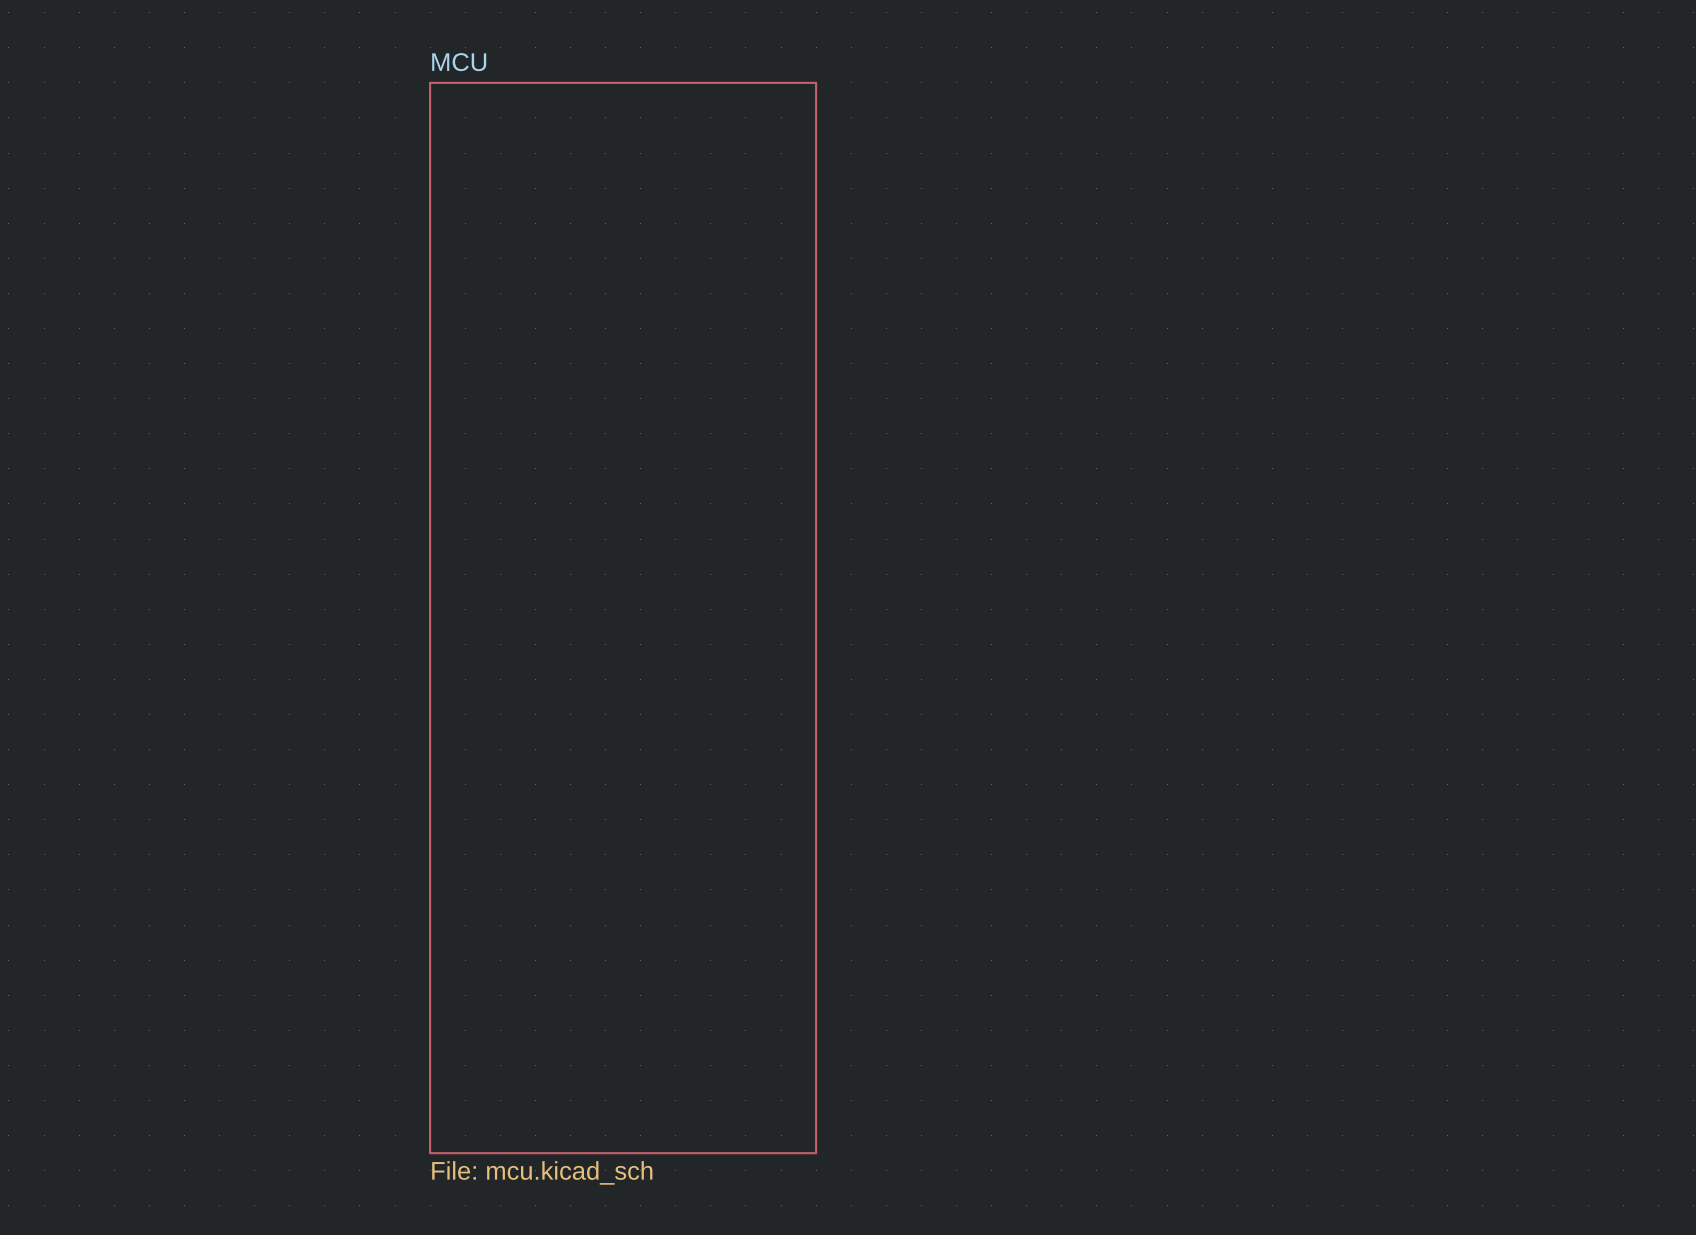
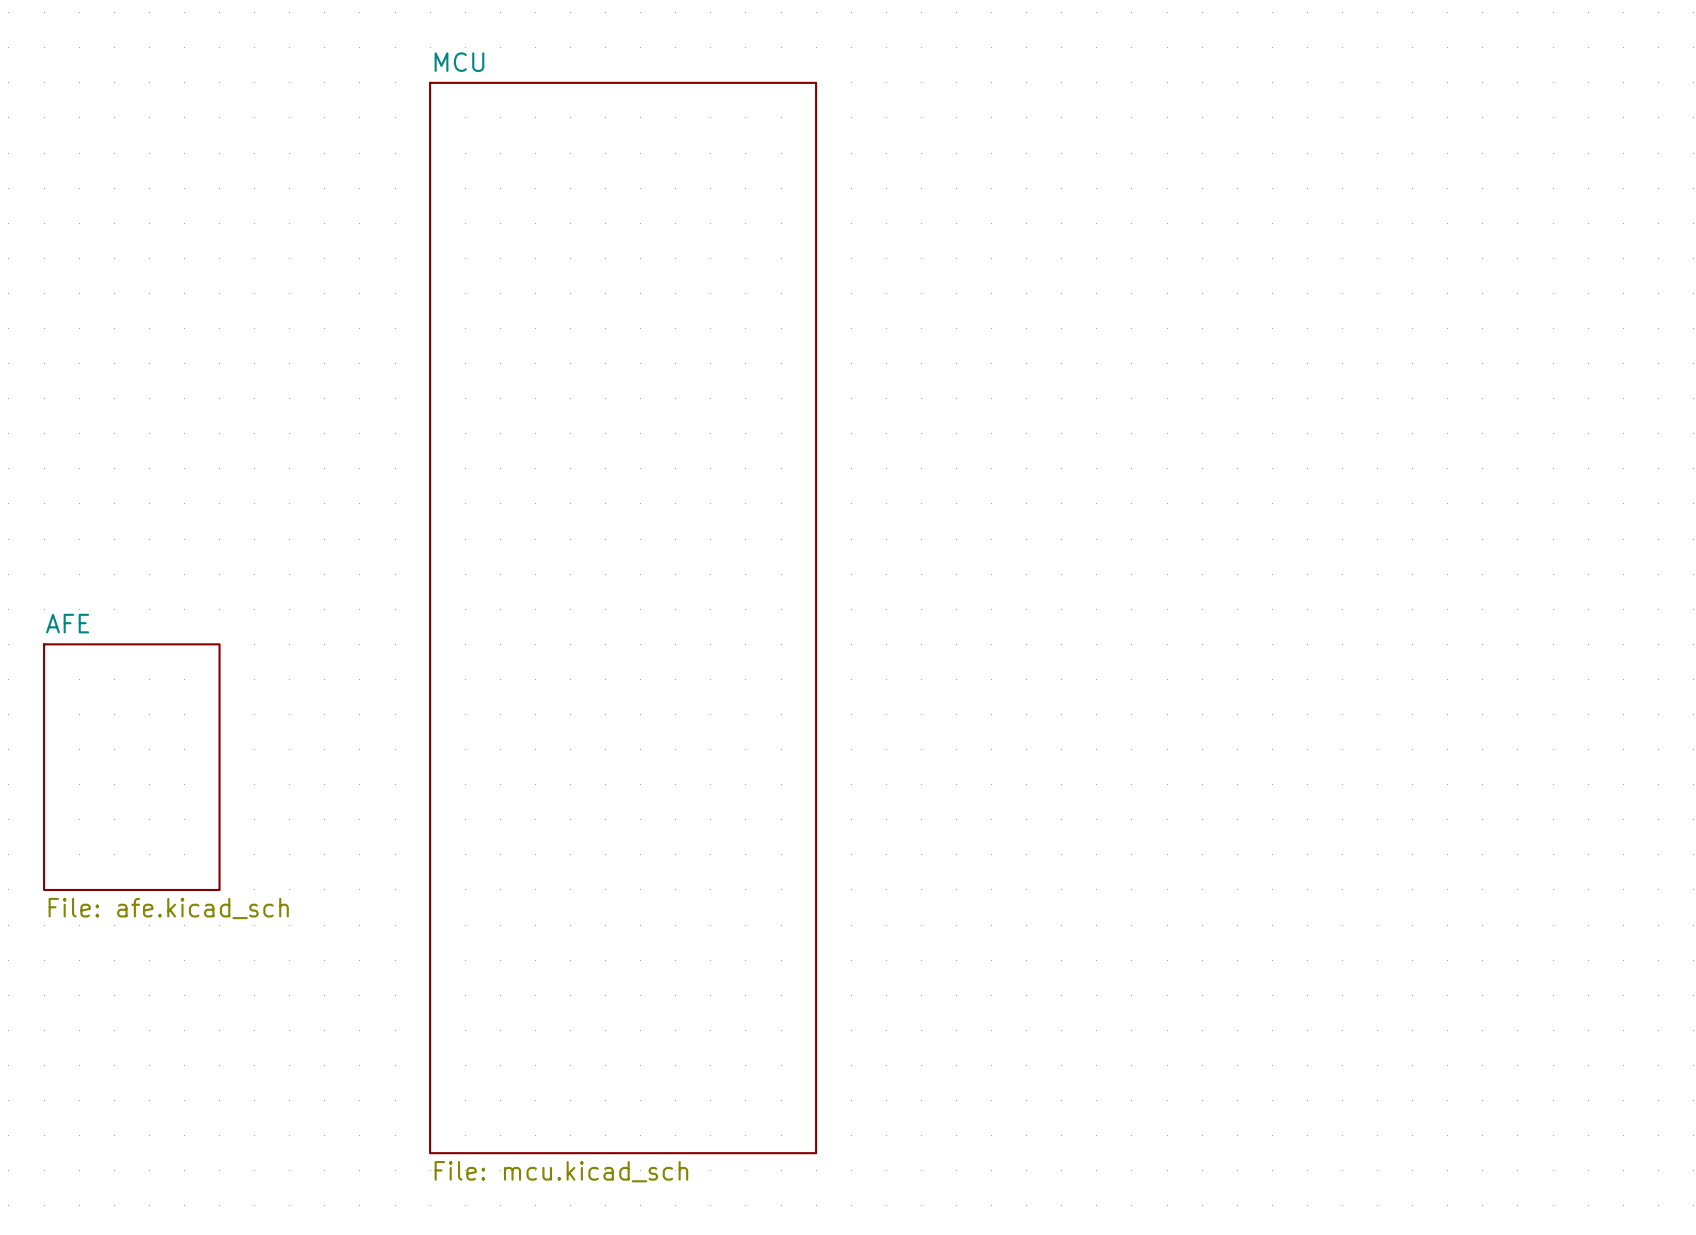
sheet AFE: none -> File: afe.kicad_sch (131, 767)

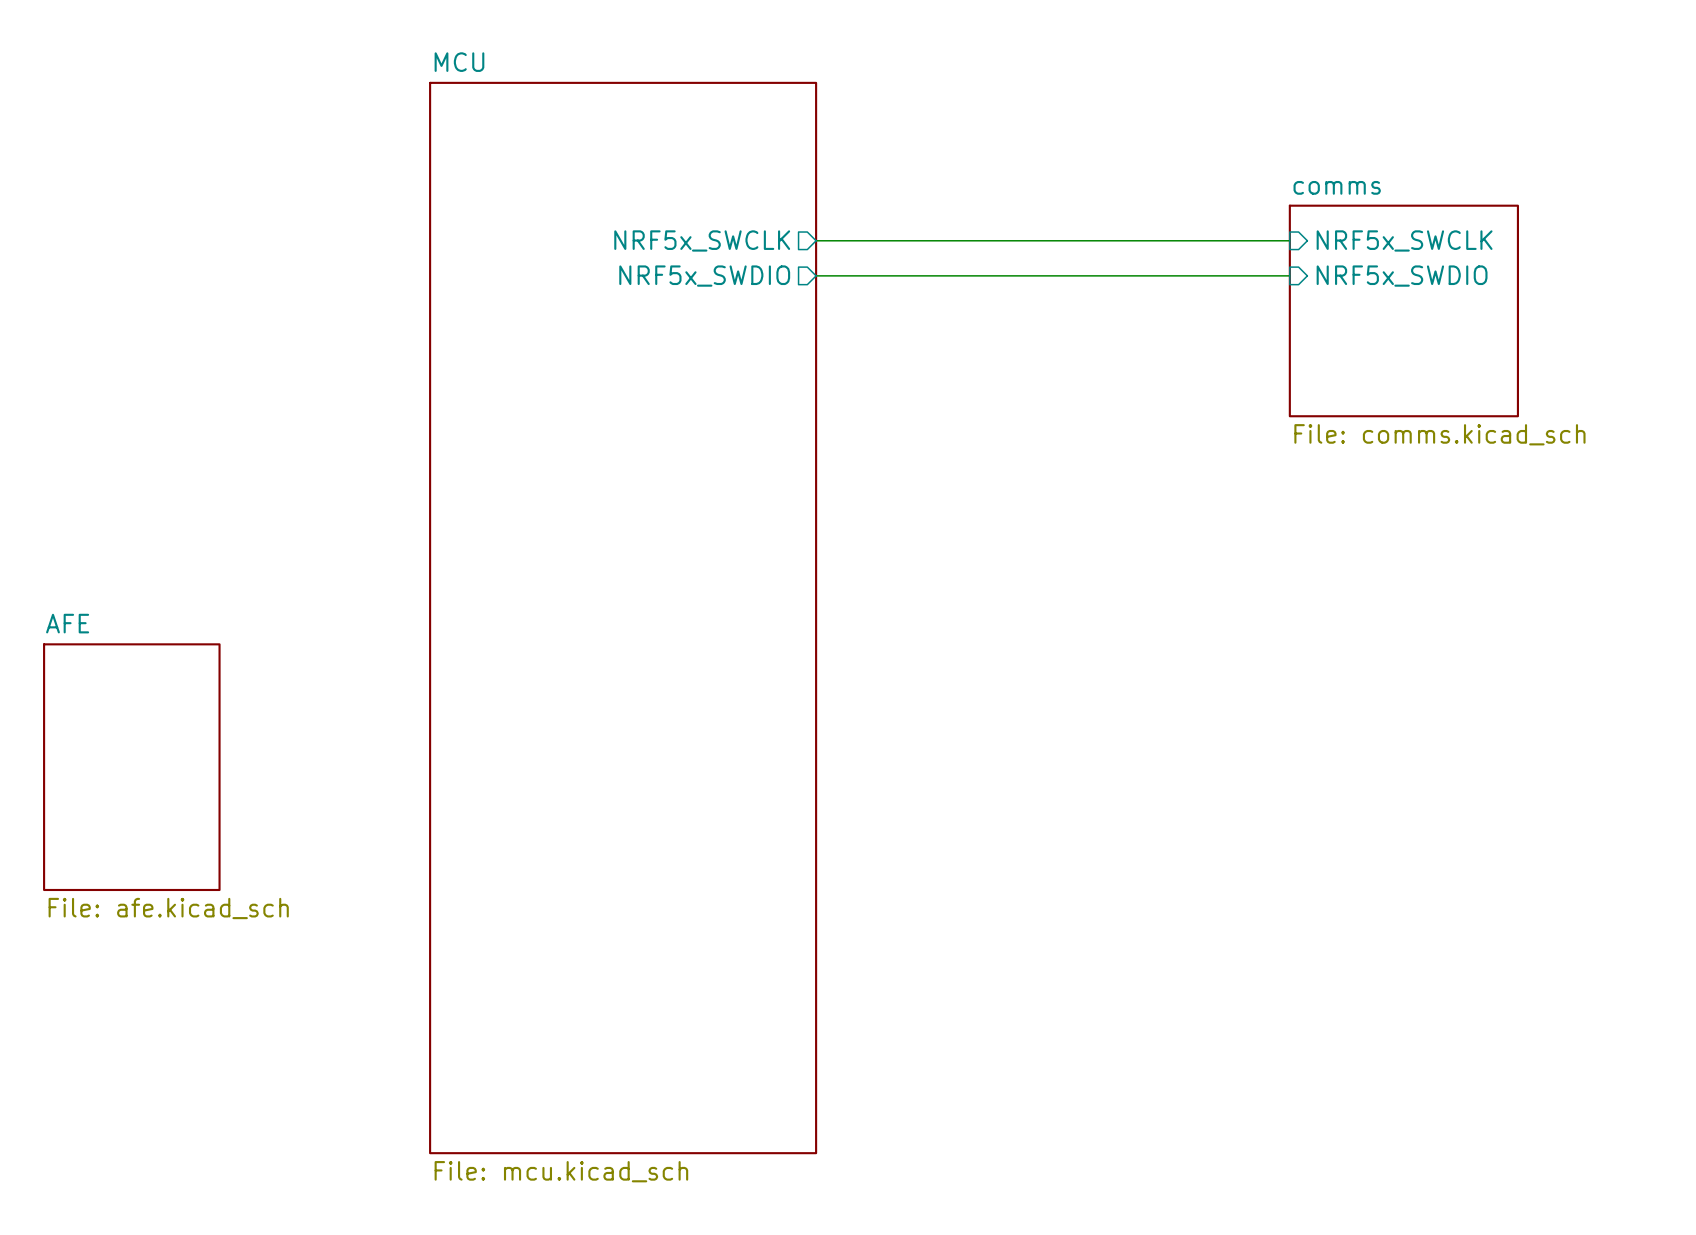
sheet pin: none -> NRF5x_SWCLK (702, 240)
wire: none -> (816, 240) (1289, 240)
sheet pin: none -> NRF5x_SWCLK (1404, 240)
wire: none -> (816, 275) (1289, 275)
sheet pin: none -> NRF5x_SWDIO (704, 276)
sheet pin: none -> NRF5x_SWDIO (1402, 276)
sheet comms: none -> File: comms.kicad_sch (1403, 310)

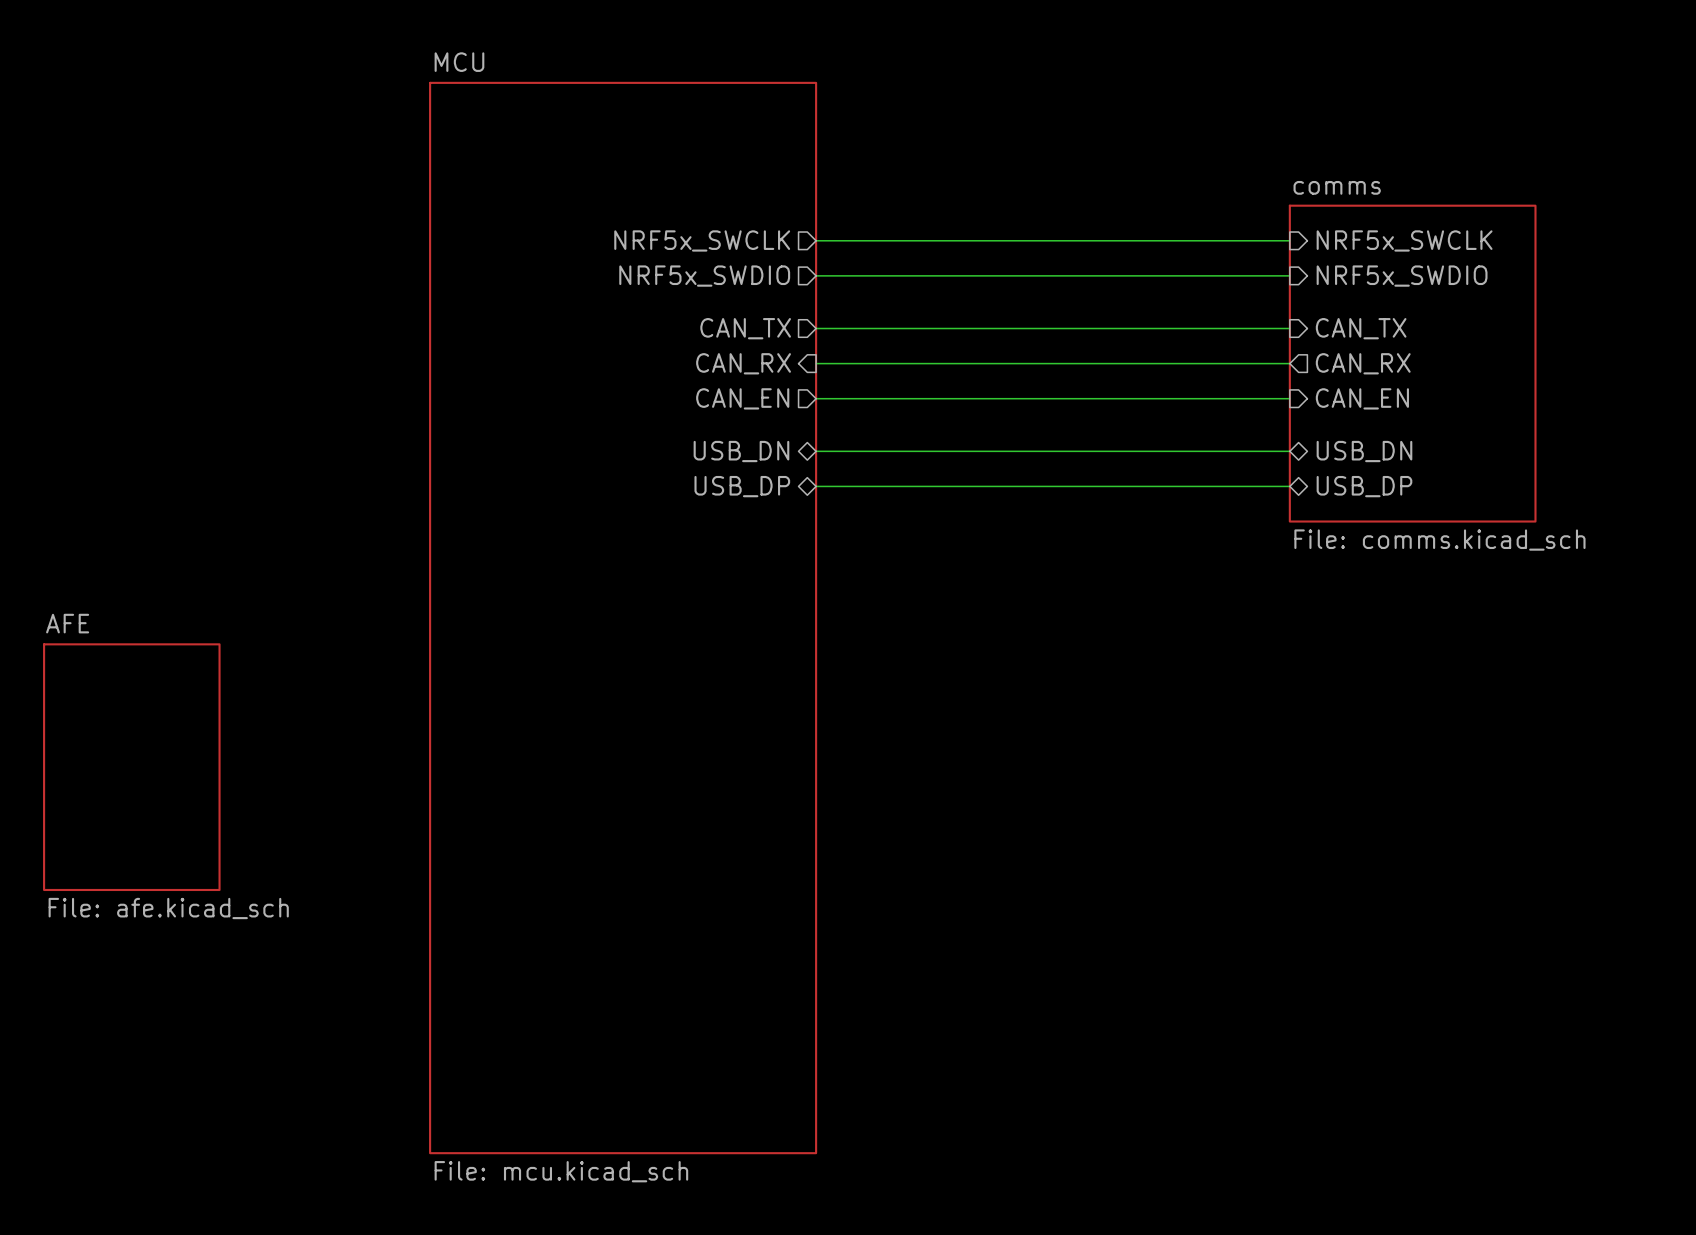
sheet comms: File: comms.kicad_sch (1403, 310) -> none
sheet pin: none -> CAN_TX (745, 328)
wire: none -> (816, 328) (1289, 328)
sheet pin: none -> CAN_TX (1361, 328)
sheet pin: none -> CAN_RX (743, 363)
wire: none -> (816, 363) (1289, 363)
sheet pin: none -> CAN_RX (1363, 363)
sheet comms: none -> File: comms.kicad_sch (1412, 363)
sheet pin: none -> CAN_EN (742, 398)
wire: none -> (816, 398) (1289, 398)
sheet pin: none -> CAN_EN (1362, 398)
sheet pin: none -> USB_DN (741, 451)
wire: none -> (816, 451) (1289, 451)
sheet pin: none -> USB_DN (1364, 451)
sheet pin: none -> USB_DP (742, 486)
wire: none -> (816, 486) (1289, 486)
sheet pin: none -> USB_DP (1364, 486)

